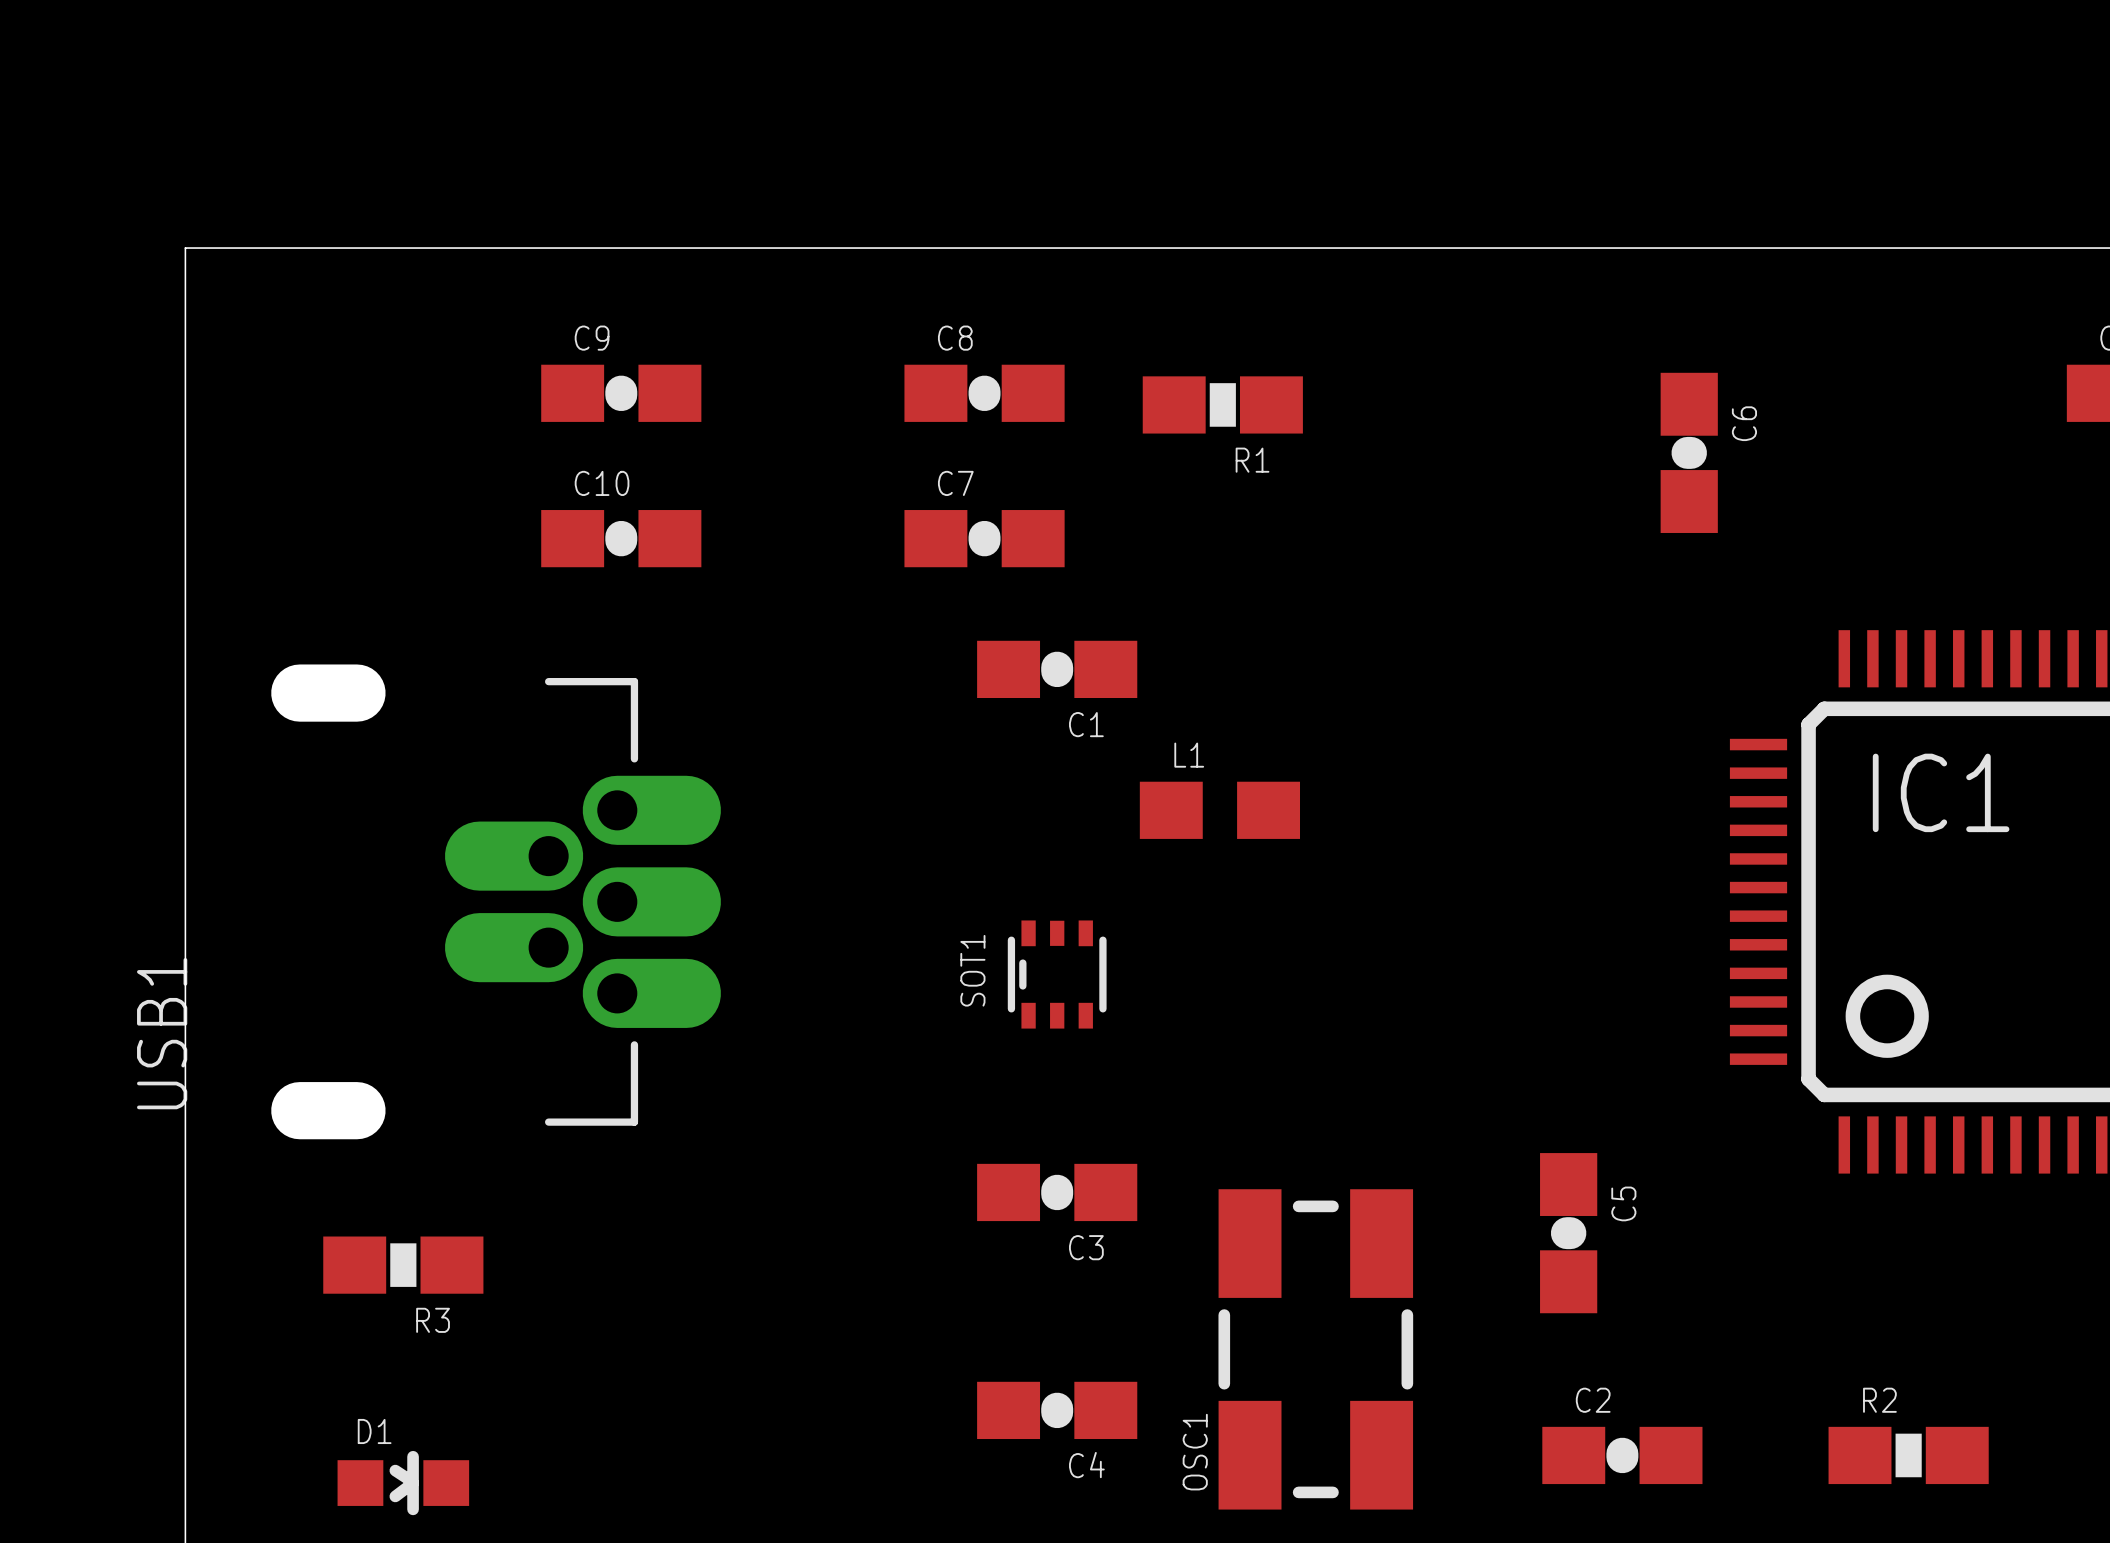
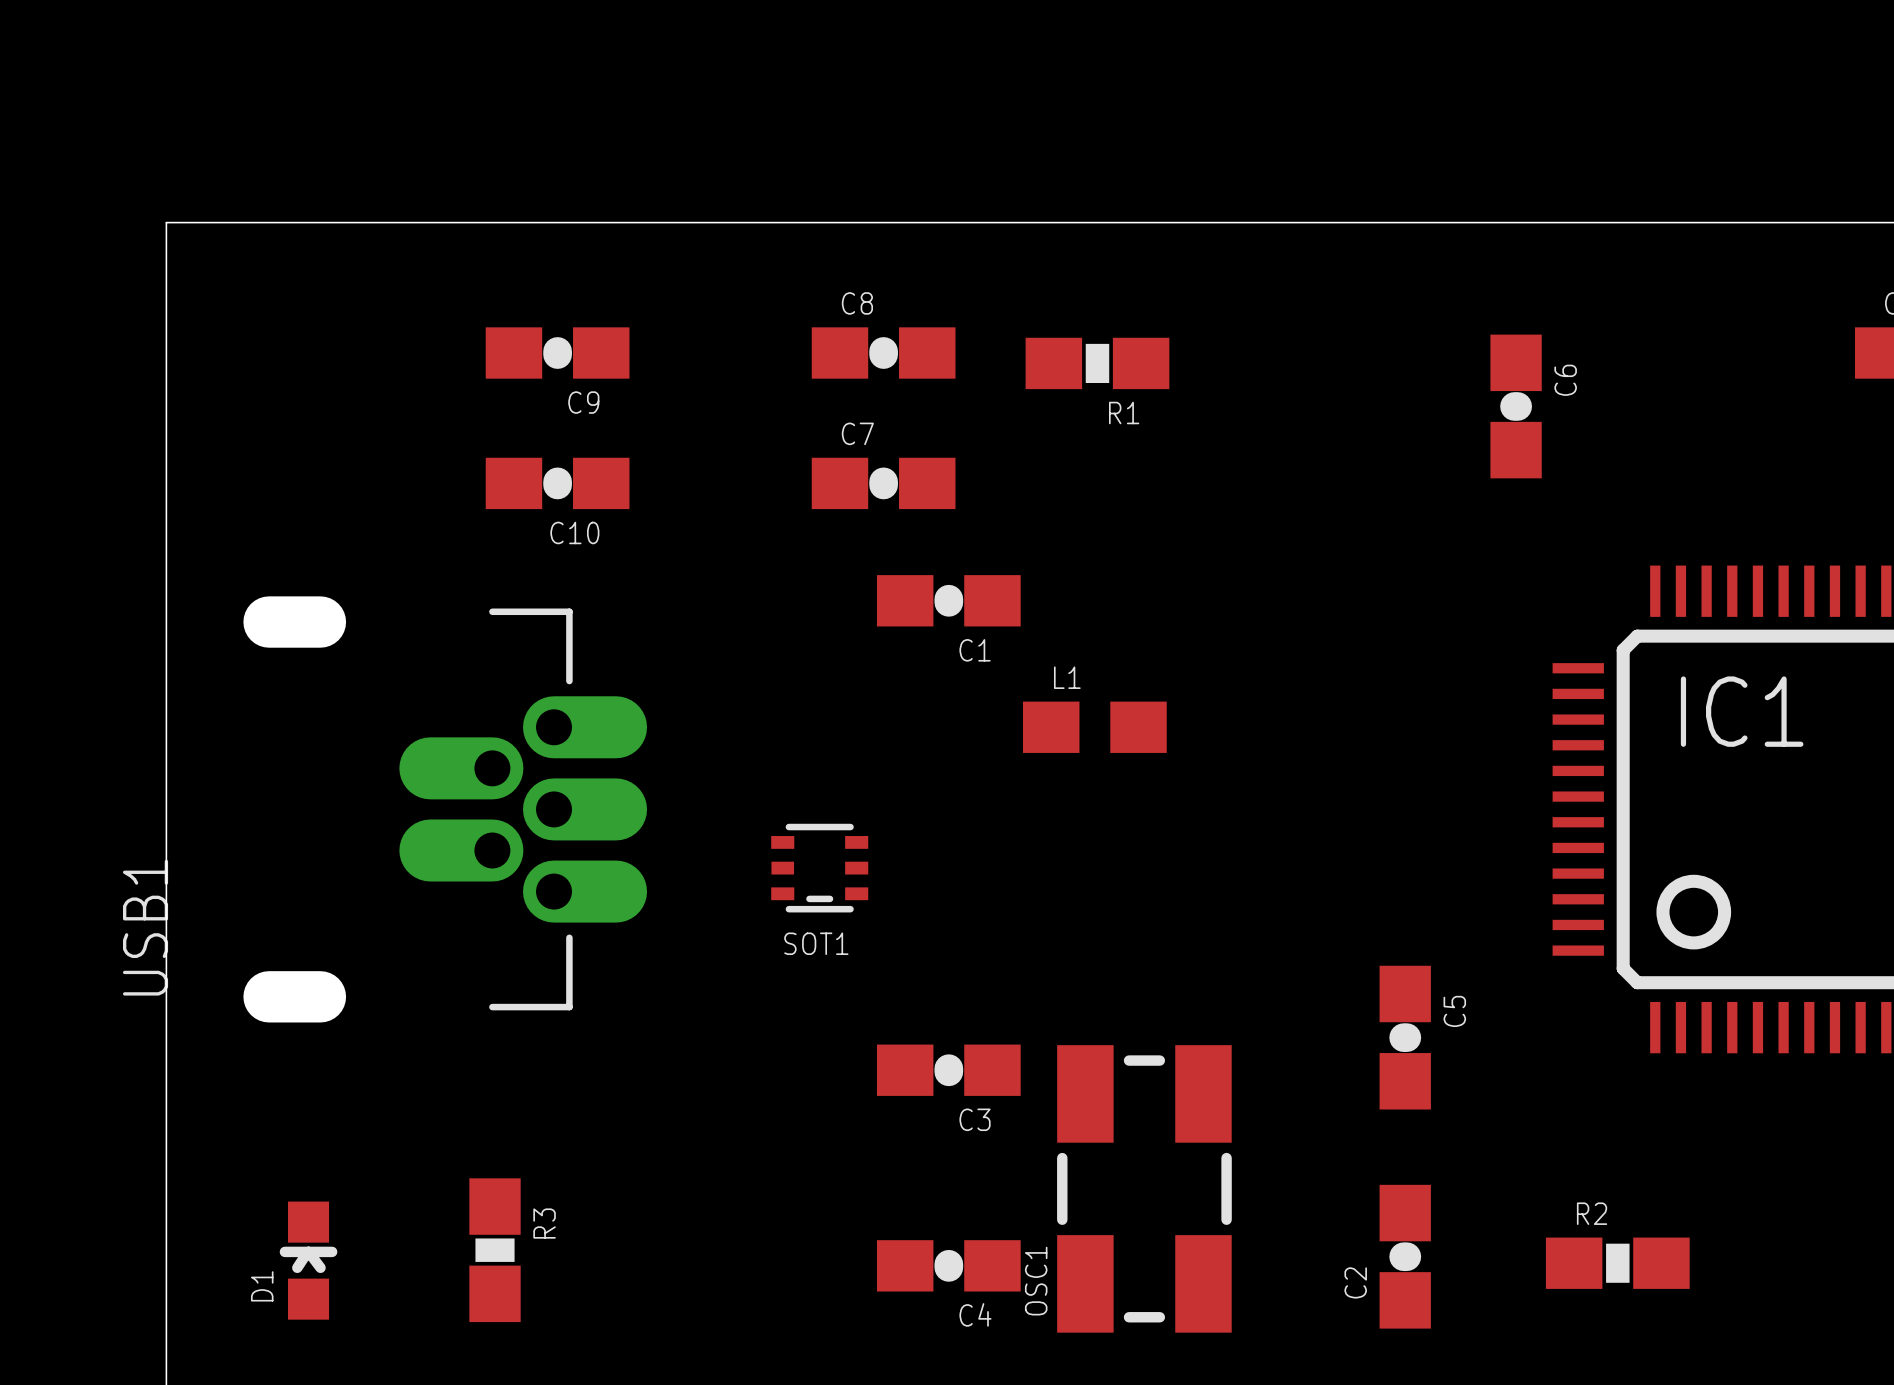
C9 name position: C9 (592, 338) -> C9 (583, 402)
C10 name position: C10 (602, 483) -> C10 (574, 532)
SOT1 rotation: 0° (1057, 974) -> 90° counterclockwise (819, 868)
SOT1 position: (1057, 974) -> (819, 868)
C5 position: (1568, 1233) -> (1405, 1037)
R3 rotation: 0° (403, 1265) -> 90° clockwise (495, 1250)
R3 position: (403, 1265) -> (495, 1250)
OSC1 position: (1315, 1349) -> (1144, 1188)
C2 rotation: 0° (1622, 1455) -> 90° clockwise (1405, 1256)
R2 position: (1908, 1455) -> (1617, 1263)
D1 rotation: 0° (403, 1483) -> 90° counterclockwise (308, 1260)
D1 position: (403, 1483) -> (308, 1260)

